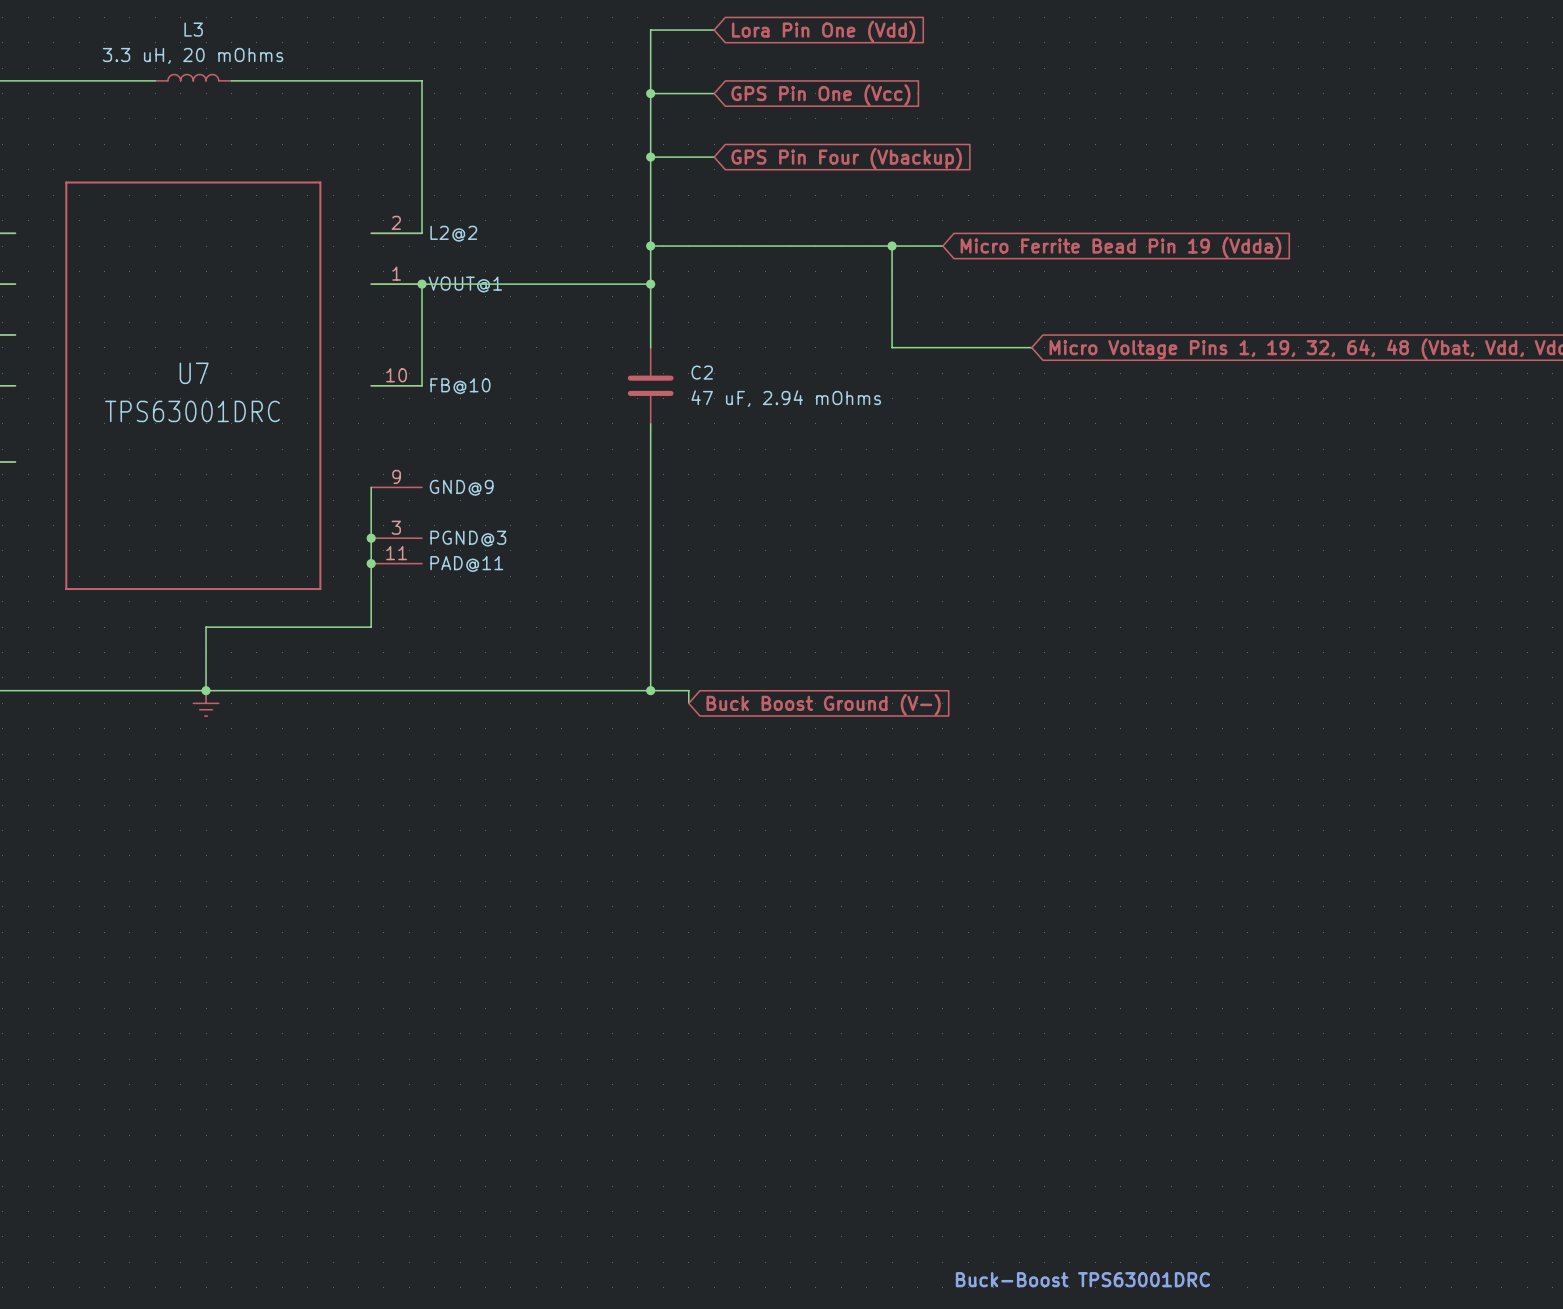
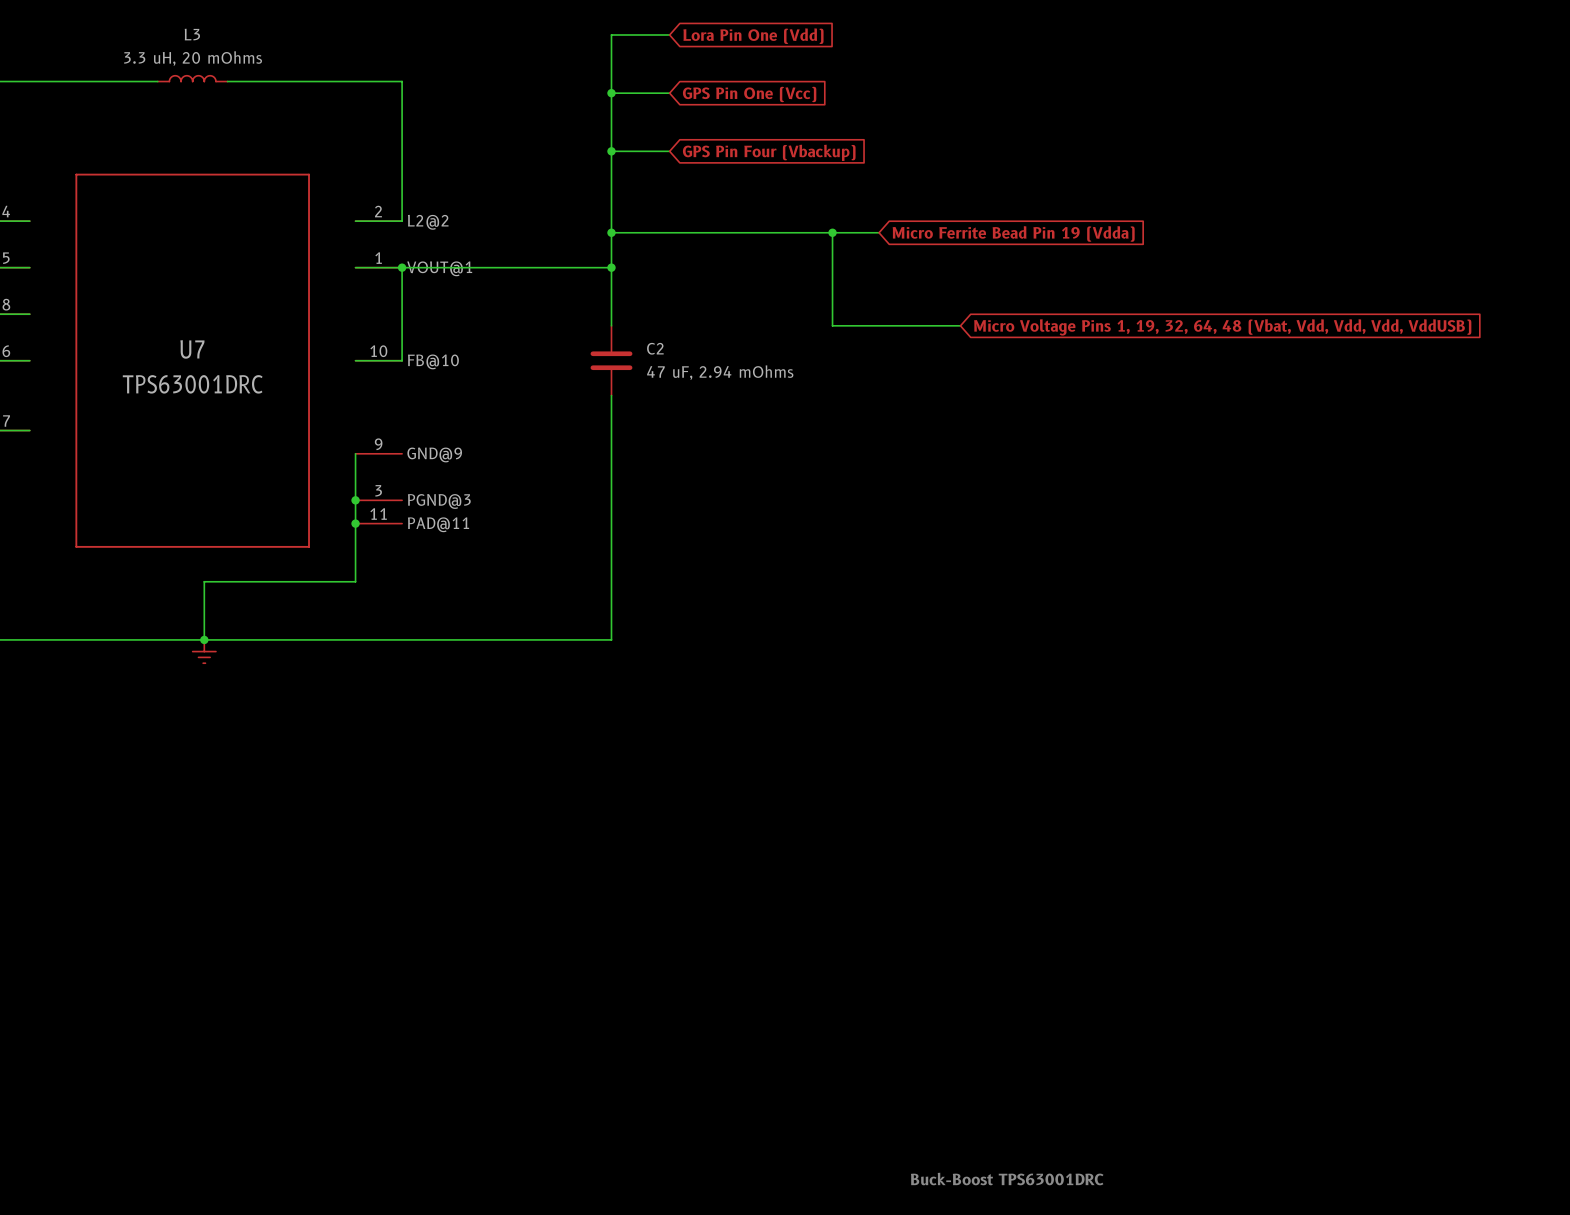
wire: (650, 690) (688, 690) (688, 703) -> none
junction: (650, 690) -> none
global label: Buck Boost Ground (V-) (823, 704) -> none

